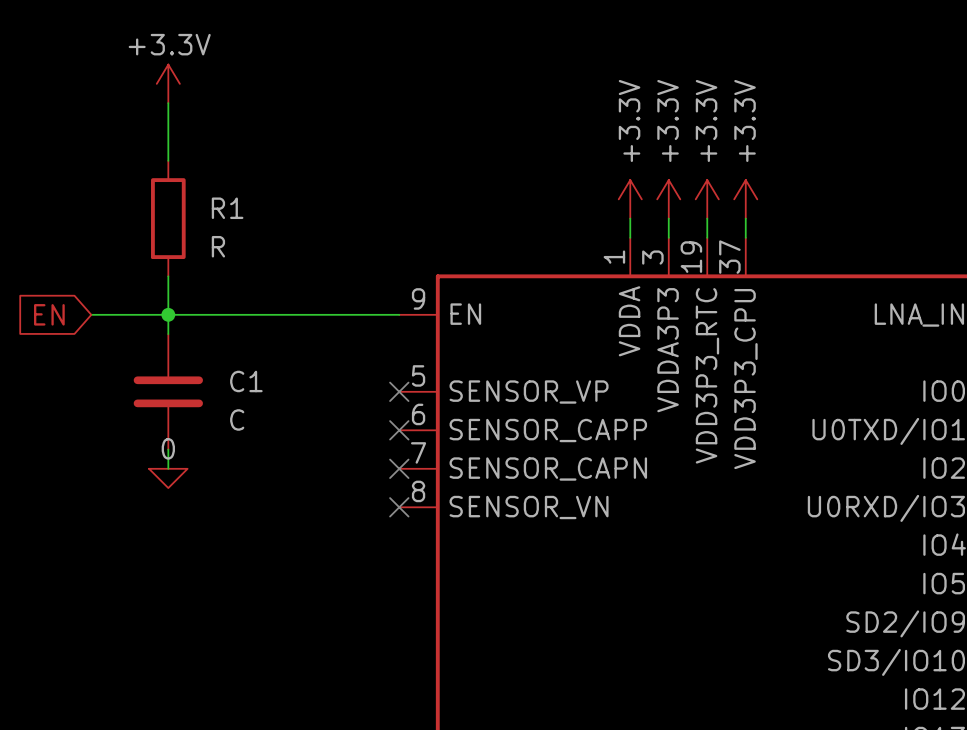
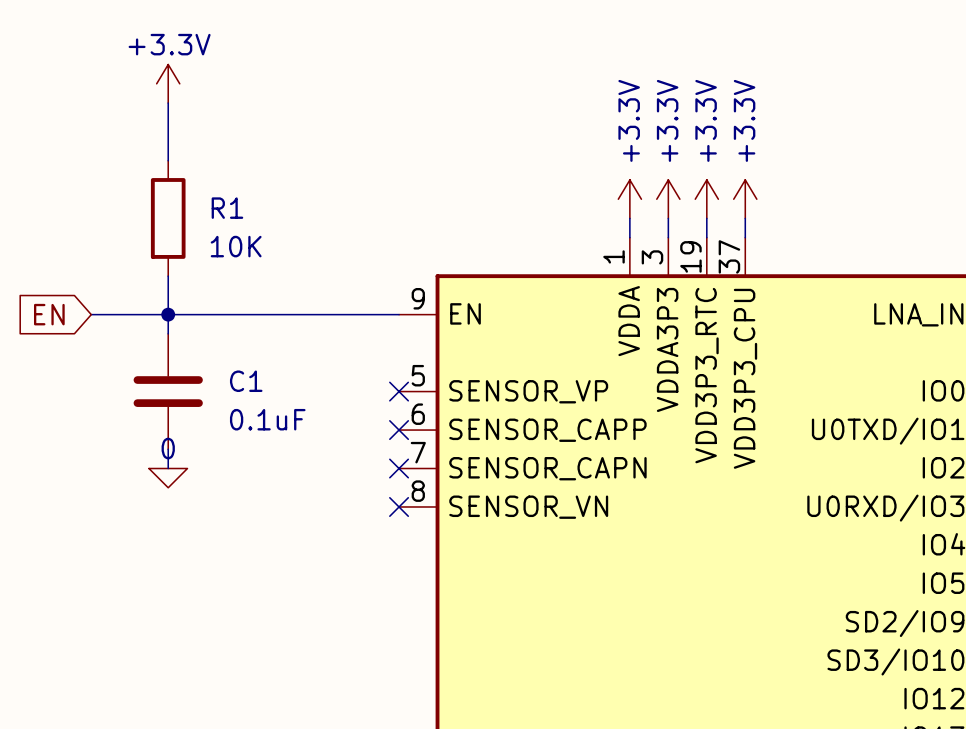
R1 value: R (218, 246) -> 10K (236, 246)
C1 value: C (237, 419) -> 0.1uF (267, 419)

